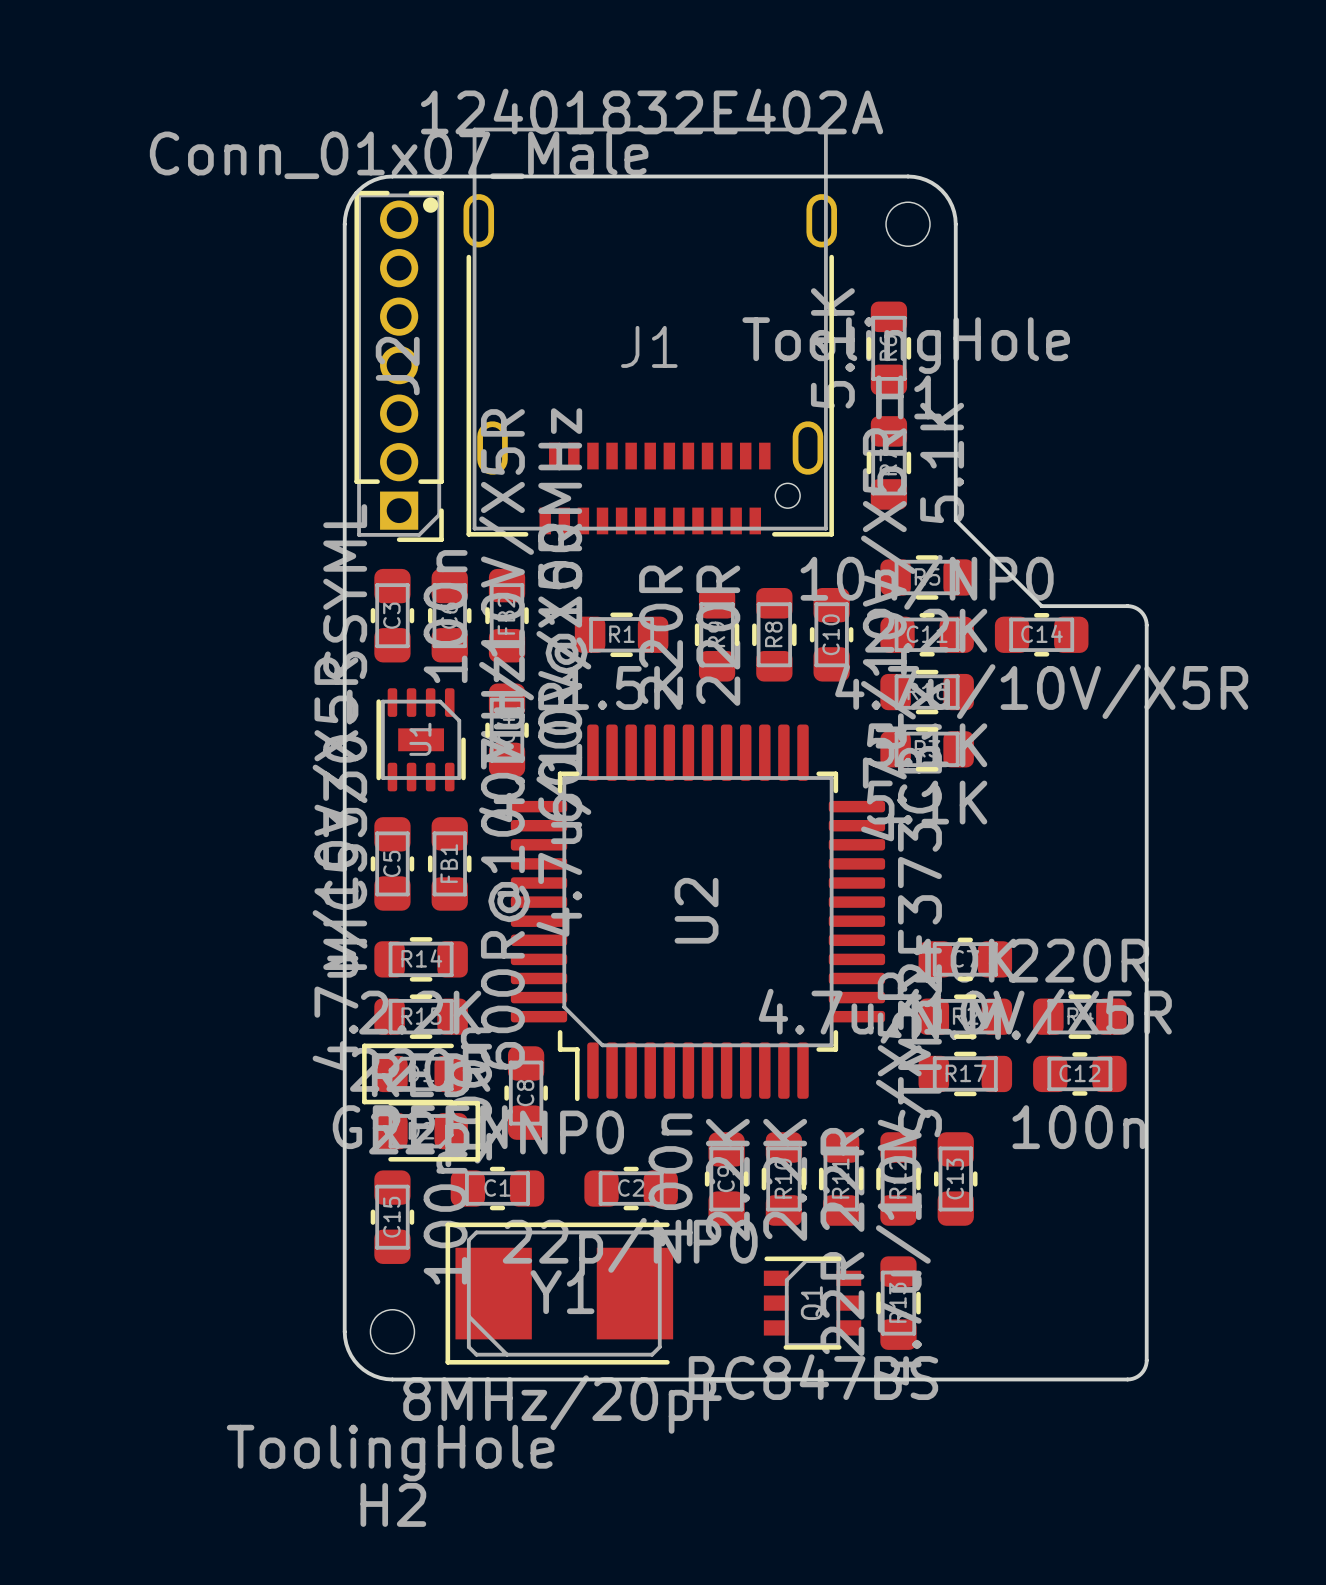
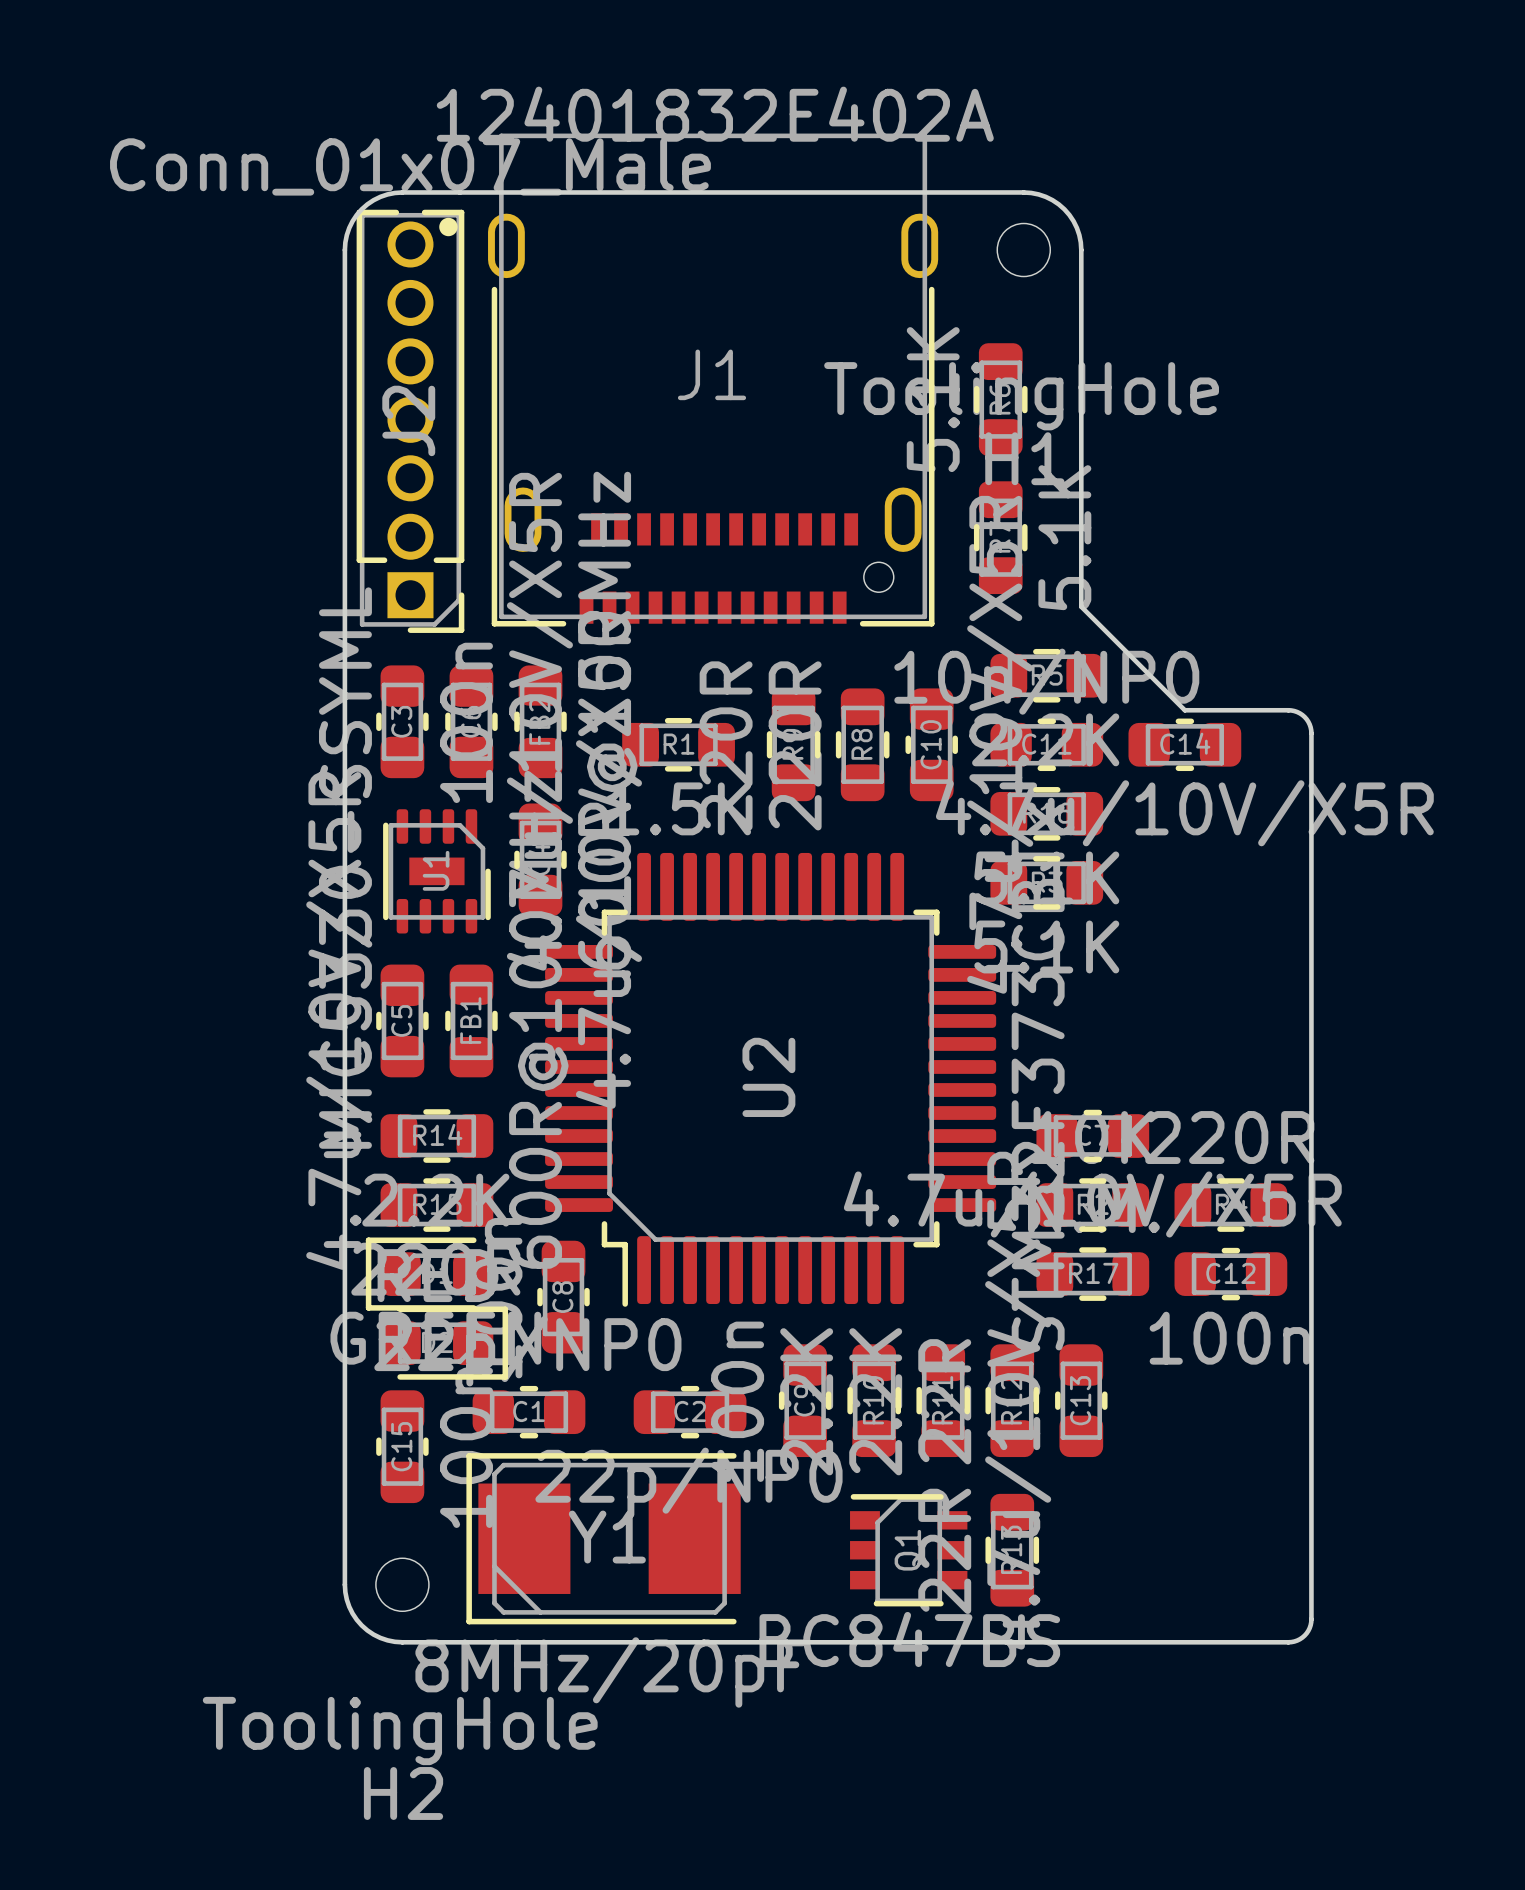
J1 name position: J1 (649, 346) -> J1 (712, 374)

